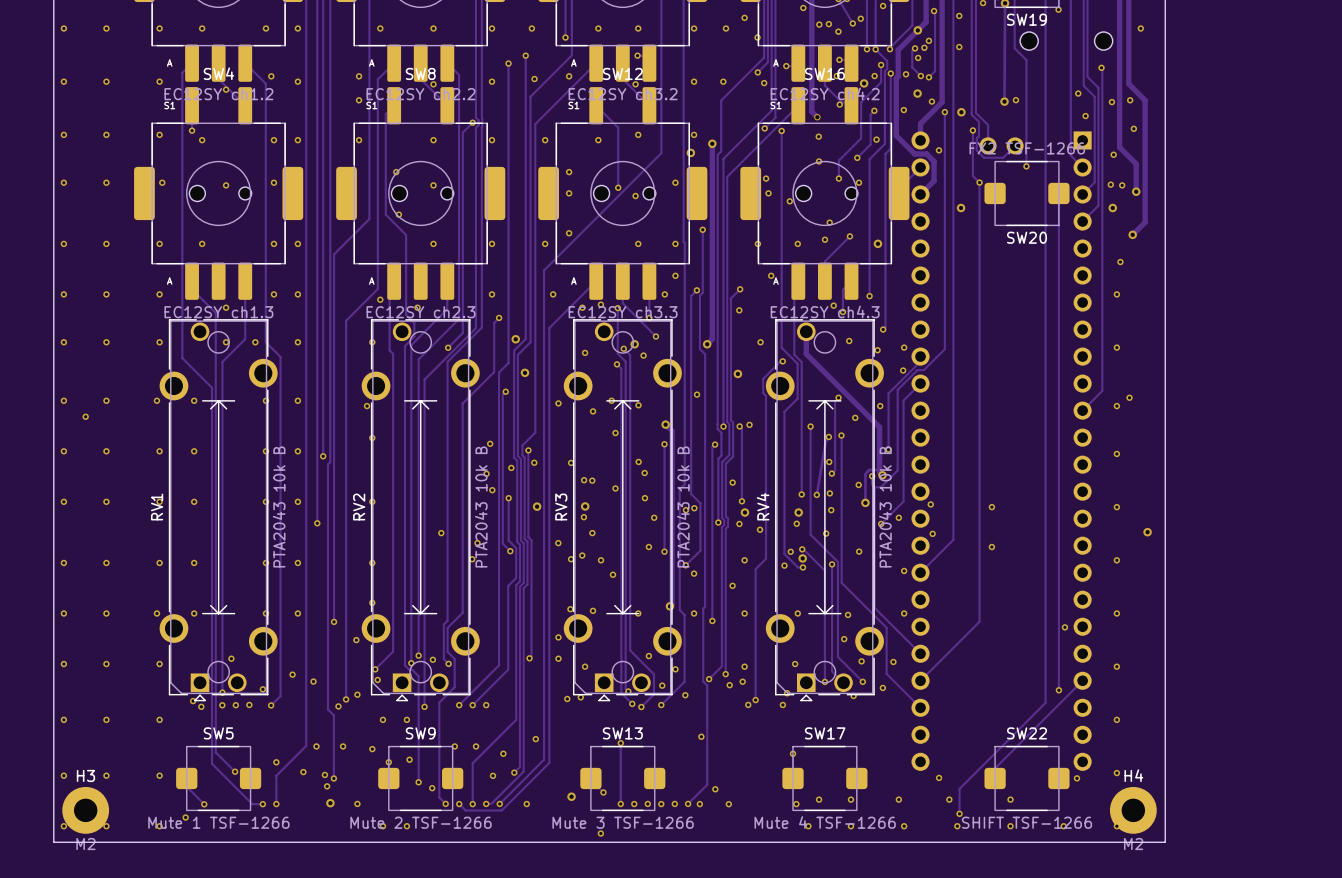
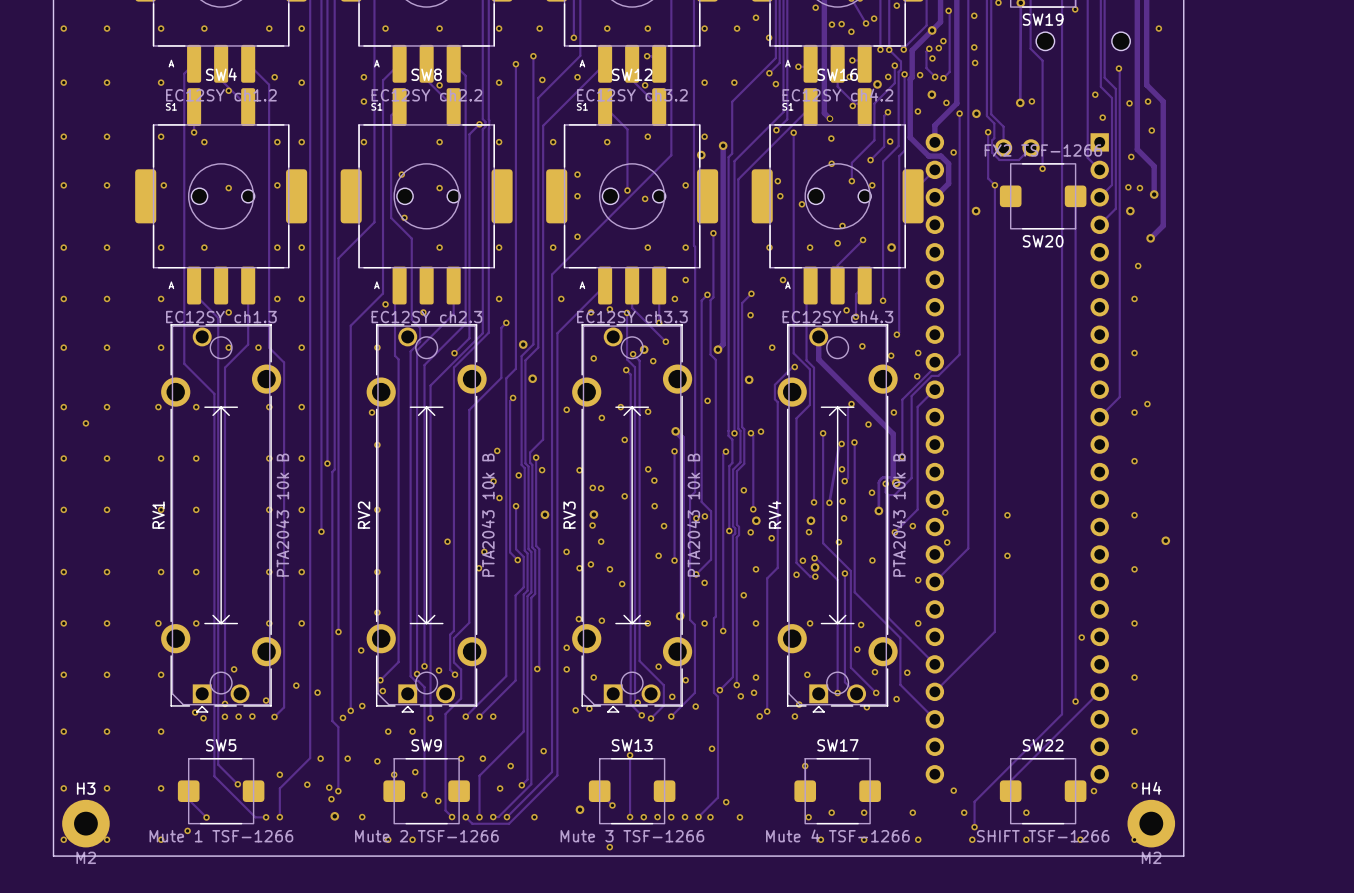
via: none -> (975, 62)

